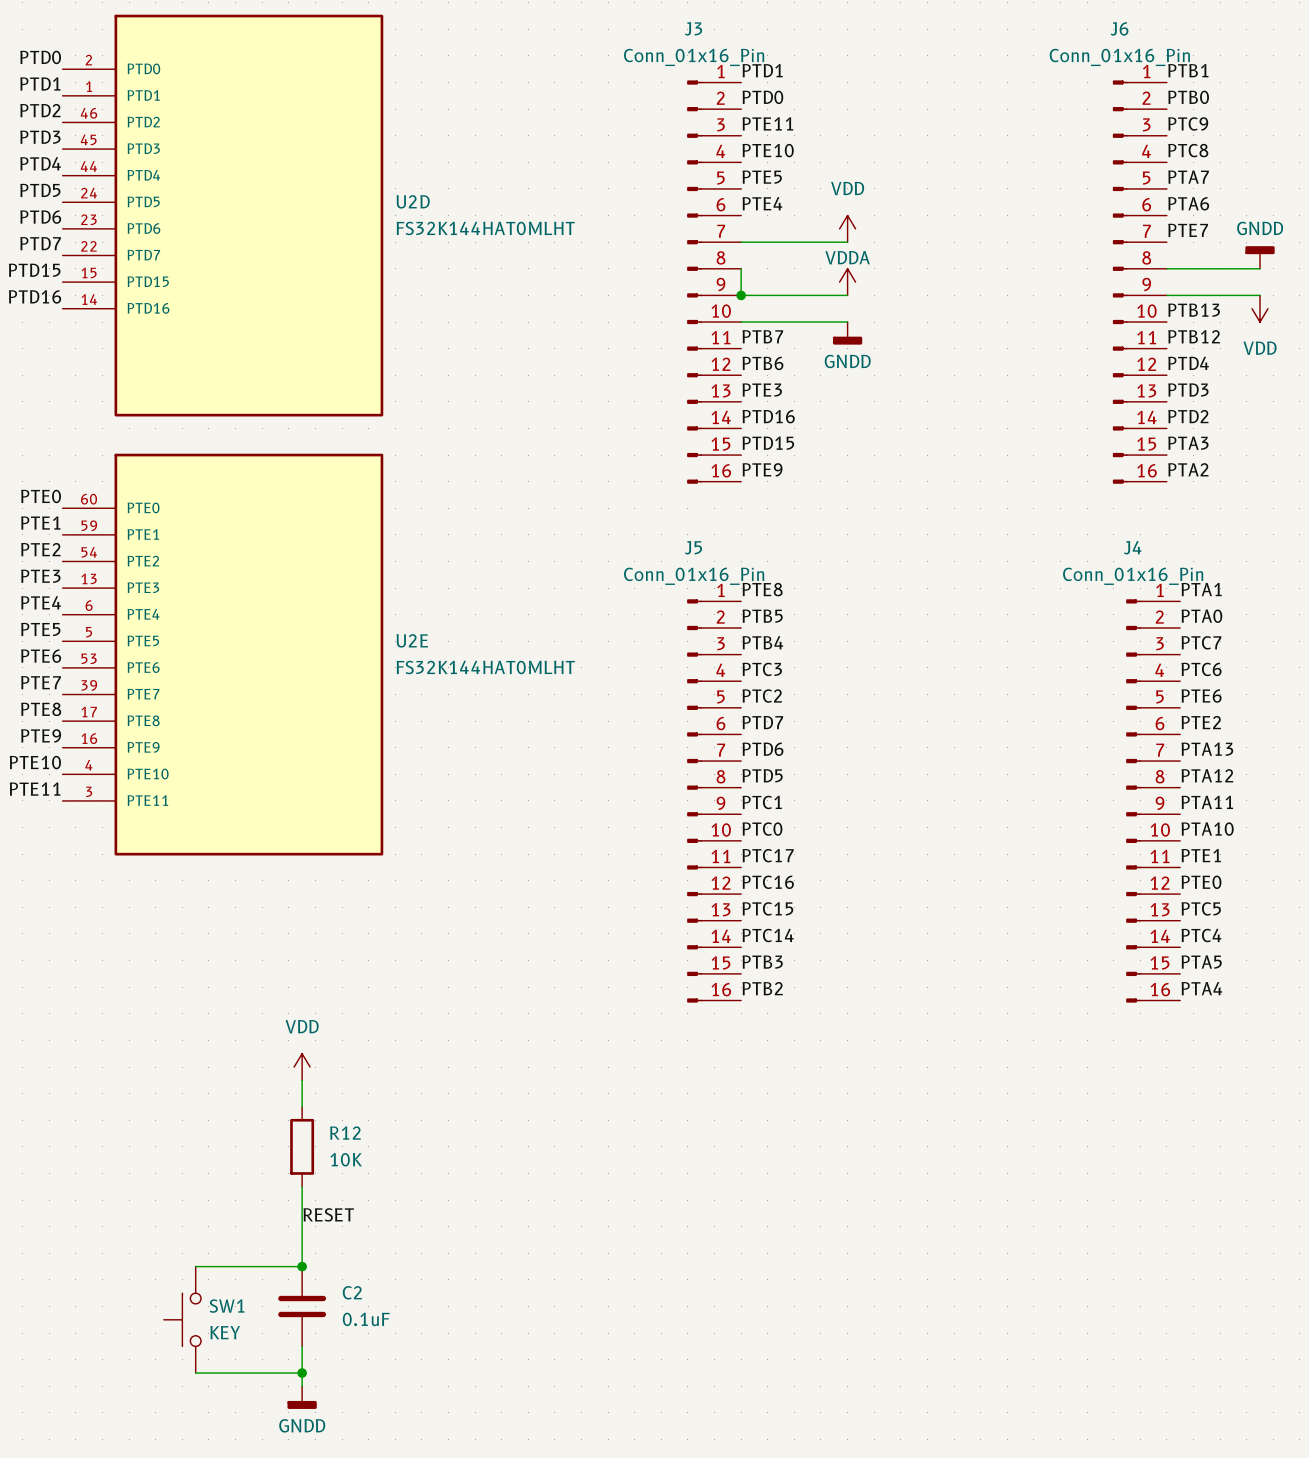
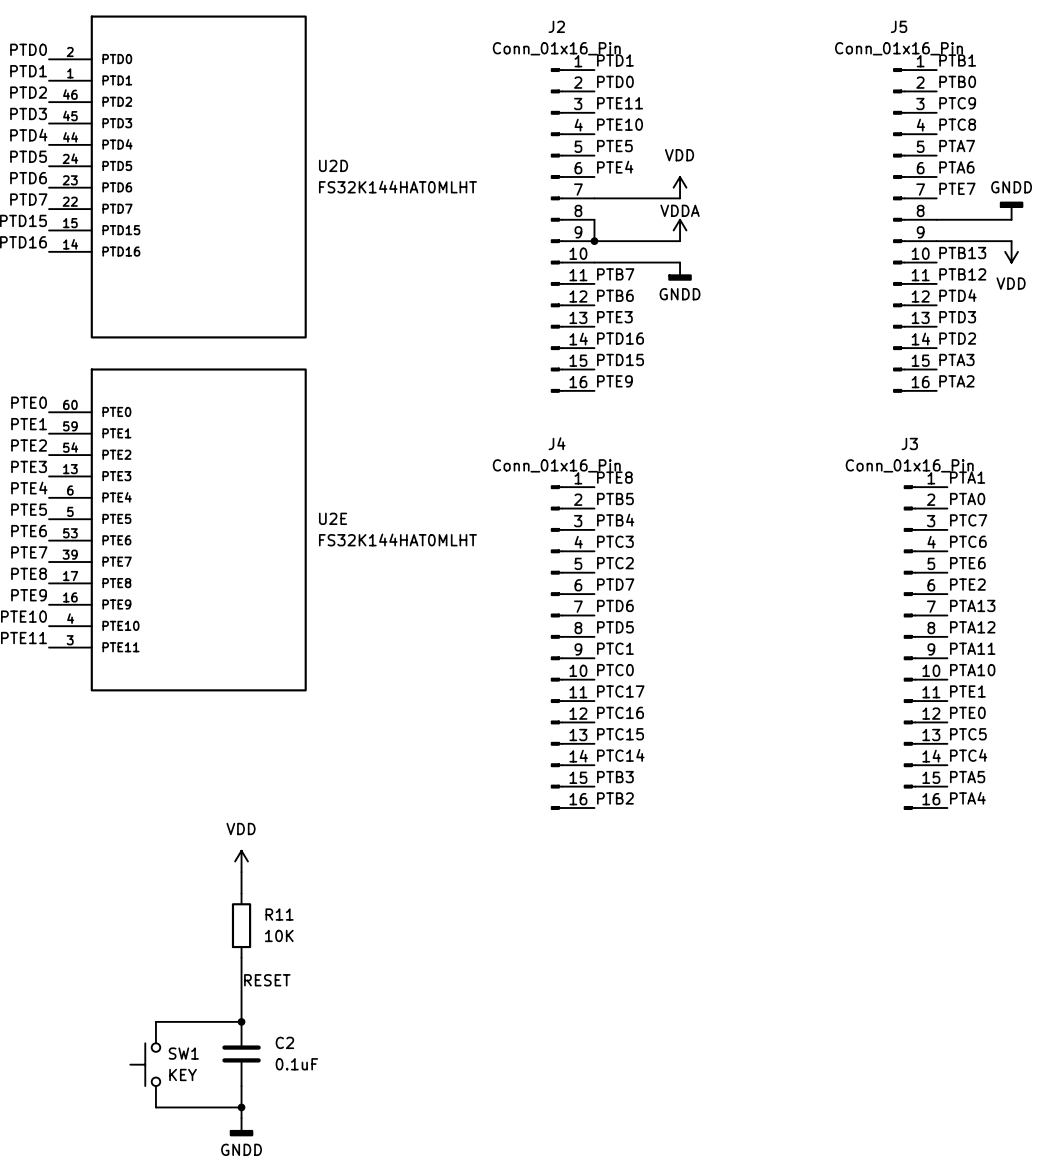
J3 name: J3 (693, 28) -> J2 (556, 26)
J6 name: J6 (1119, 28) -> J5 (899, 26)
J5 name: J5 (693, 547) -> J4 (557, 443)
J4 name: J4 (1132, 547) -> J3 (909, 443)
R12 name: R12 (345, 1133) -> R11 (279, 914)

